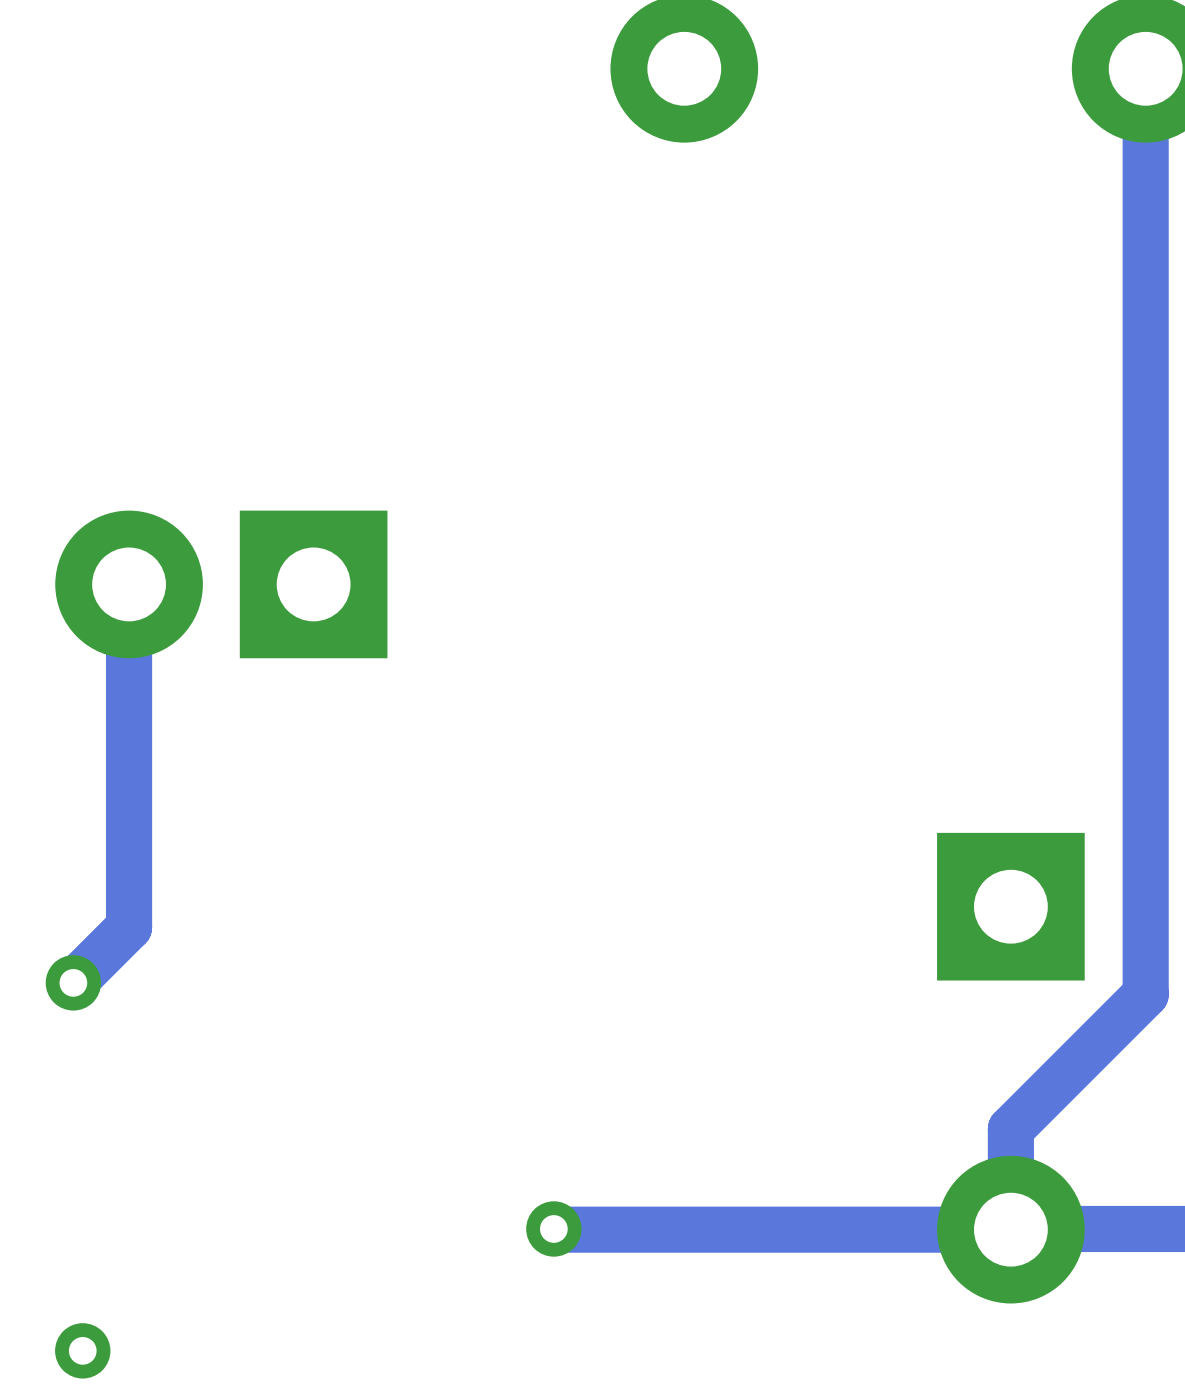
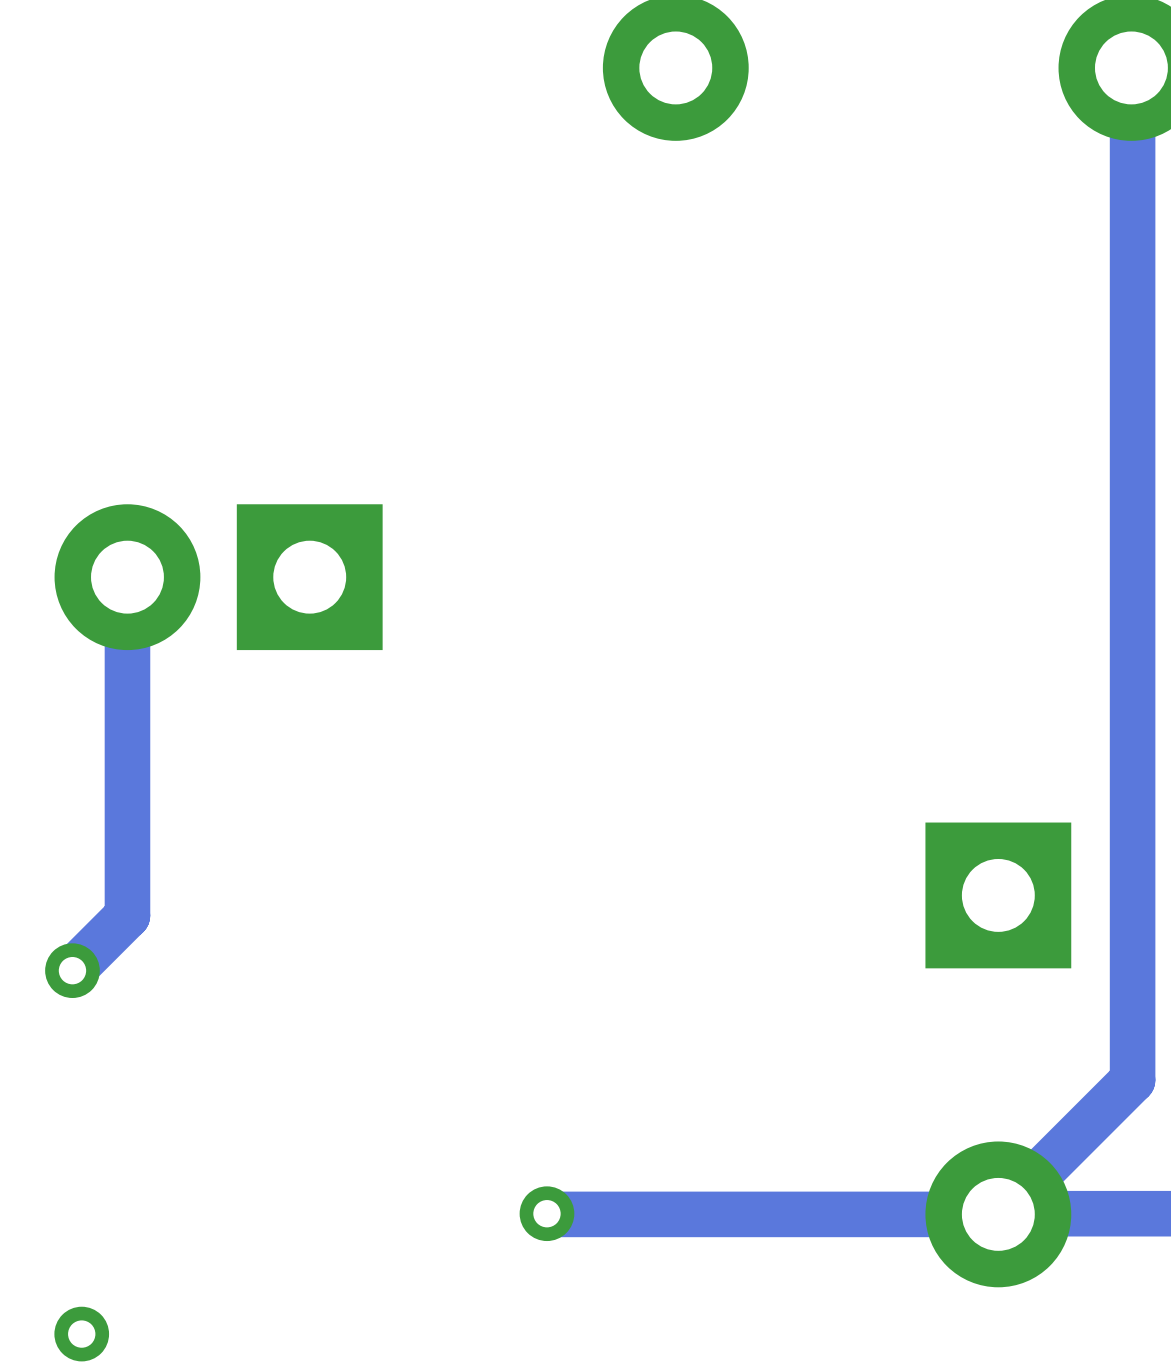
track: (1145, 68) (1145, 994) (1010, 1129) (1010, 1229) -> (1132, 69) (1132, 1080) (999, 1213)

